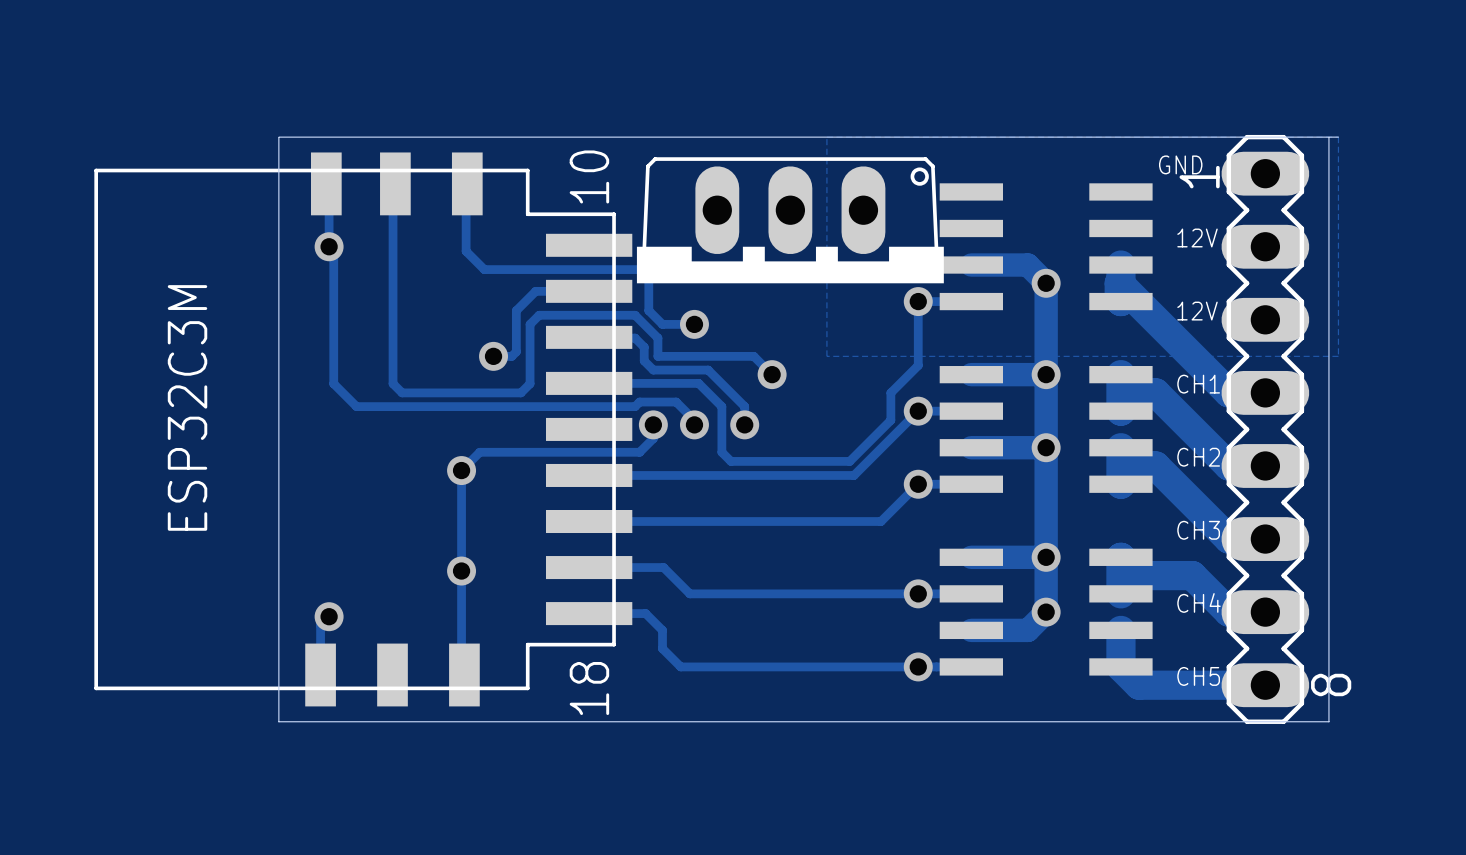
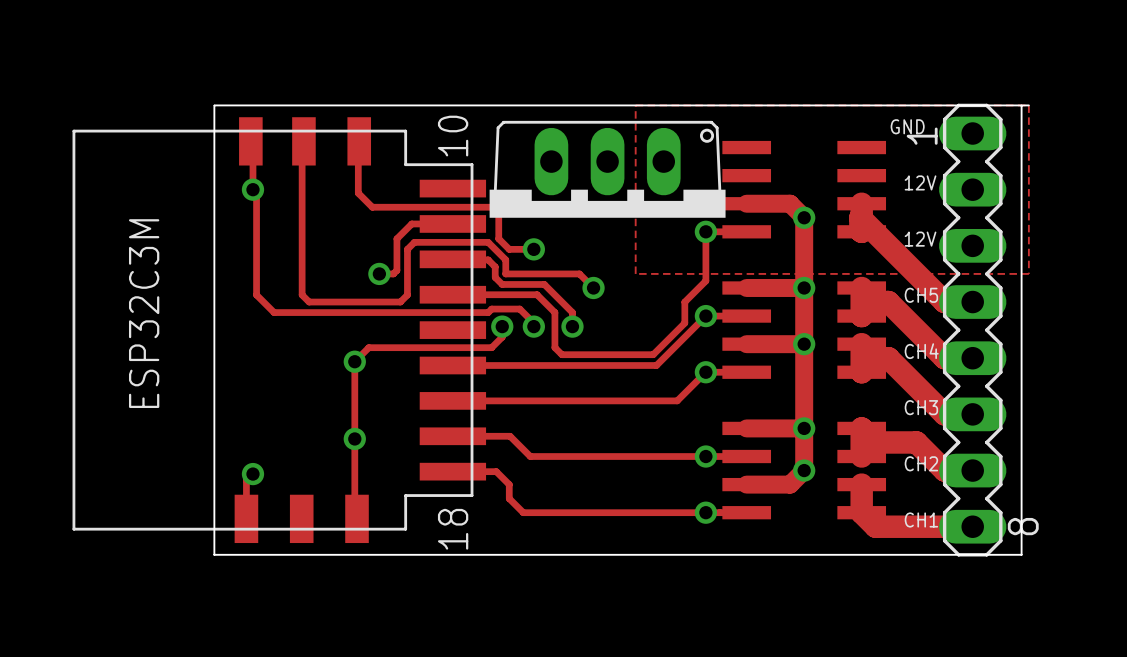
text: CH1 (1198, 384) -> CH5 (921, 295)
text: CH2 (1198, 457) -> CH4 (921, 351)
text: CH4 (1199, 602) -> CH2 (921, 463)
text: CH5 (1198, 676) -> CH1 (921, 519)

